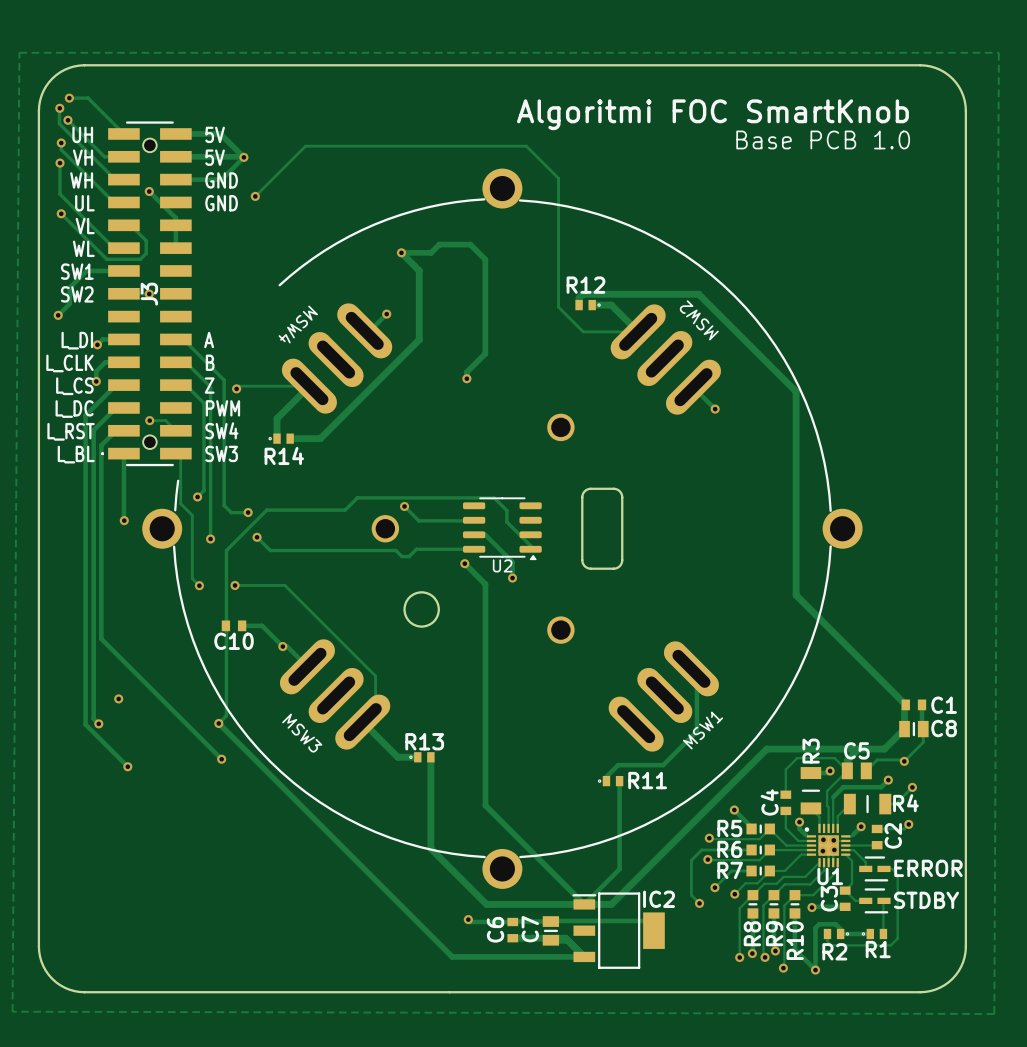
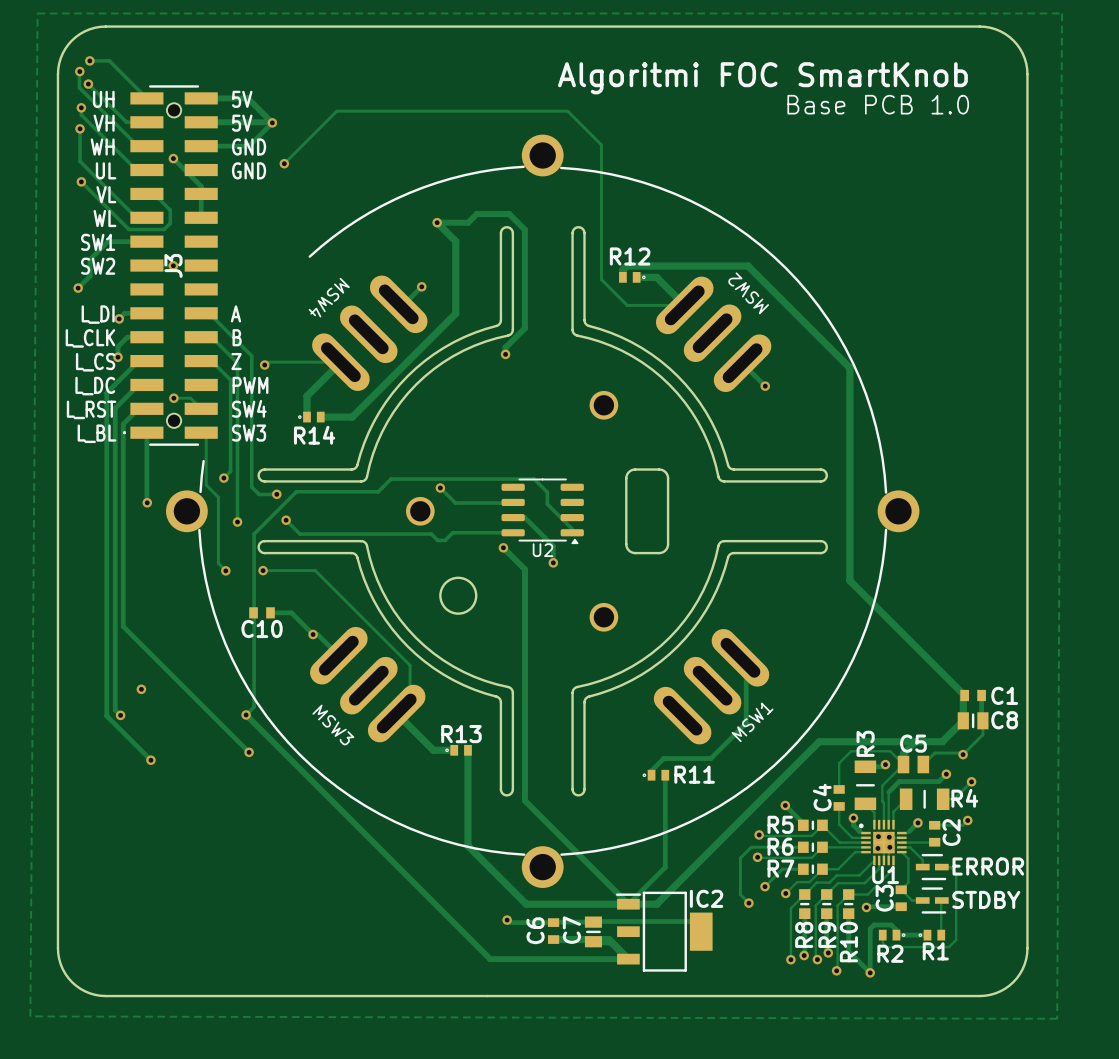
board edge: none -> (500, 233) (500, 320) (499, 324) (463, 337) (443, 347) (407, 376) (379, 412) (368, 432) (354, 468) (263, 469) (258, 473) (260, 479) (264, 481) (364, 480) (377, 442) (387, 421) (400, 402) (416, 384) (433, 369) (463, 350) (511, 334) (512, 329) (512, 232) (506, 227) (502, 229) (500, 233)
board edge: none -> (572, 233) (573, 332) (611, 345) (632, 356) (651, 369) (669, 384) (691, 411) (703, 432) (719, 479) (724, 481) (820, 481) (825, 479) (826, 473) (821, 469) (733, 469) (729, 467) (716, 432) (706, 412) (677, 376) (641, 347) (621, 337) (585, 323) (584, 232) (578, 227) (574, 229) (572, 233)
board edge: none -> (264, 541) (364, 542) (377, 579) (387, 600) (400, 620) (416, 637) (443, 660) (463, 671) (511, 688) (512, 692) (512, 789) (510, 793) (504, 794) (500, 790) (500, 702) (499, 698) (463, 685) (443, 674) (407, 646) (379, 610) (368, 590) (354, 553) (263, 553) (258, 547) (260, 542) (264, 541)
board edge: none -> (724, 541) (821, 541) (825, 543) (826, 547) (821, 553) (733, 553) (729, 554) (716, 590) (706, 610) (677, 646) (641, 674) (621, 685) (585, 699) (584, 790) (581, 794) (575, 794) (572, 789) (573, 689) (611, 676) (632, 666) (651, 653) (669, 637) (684, 620) (697, 600) (712, 568) (718, 544) (724, 541)

